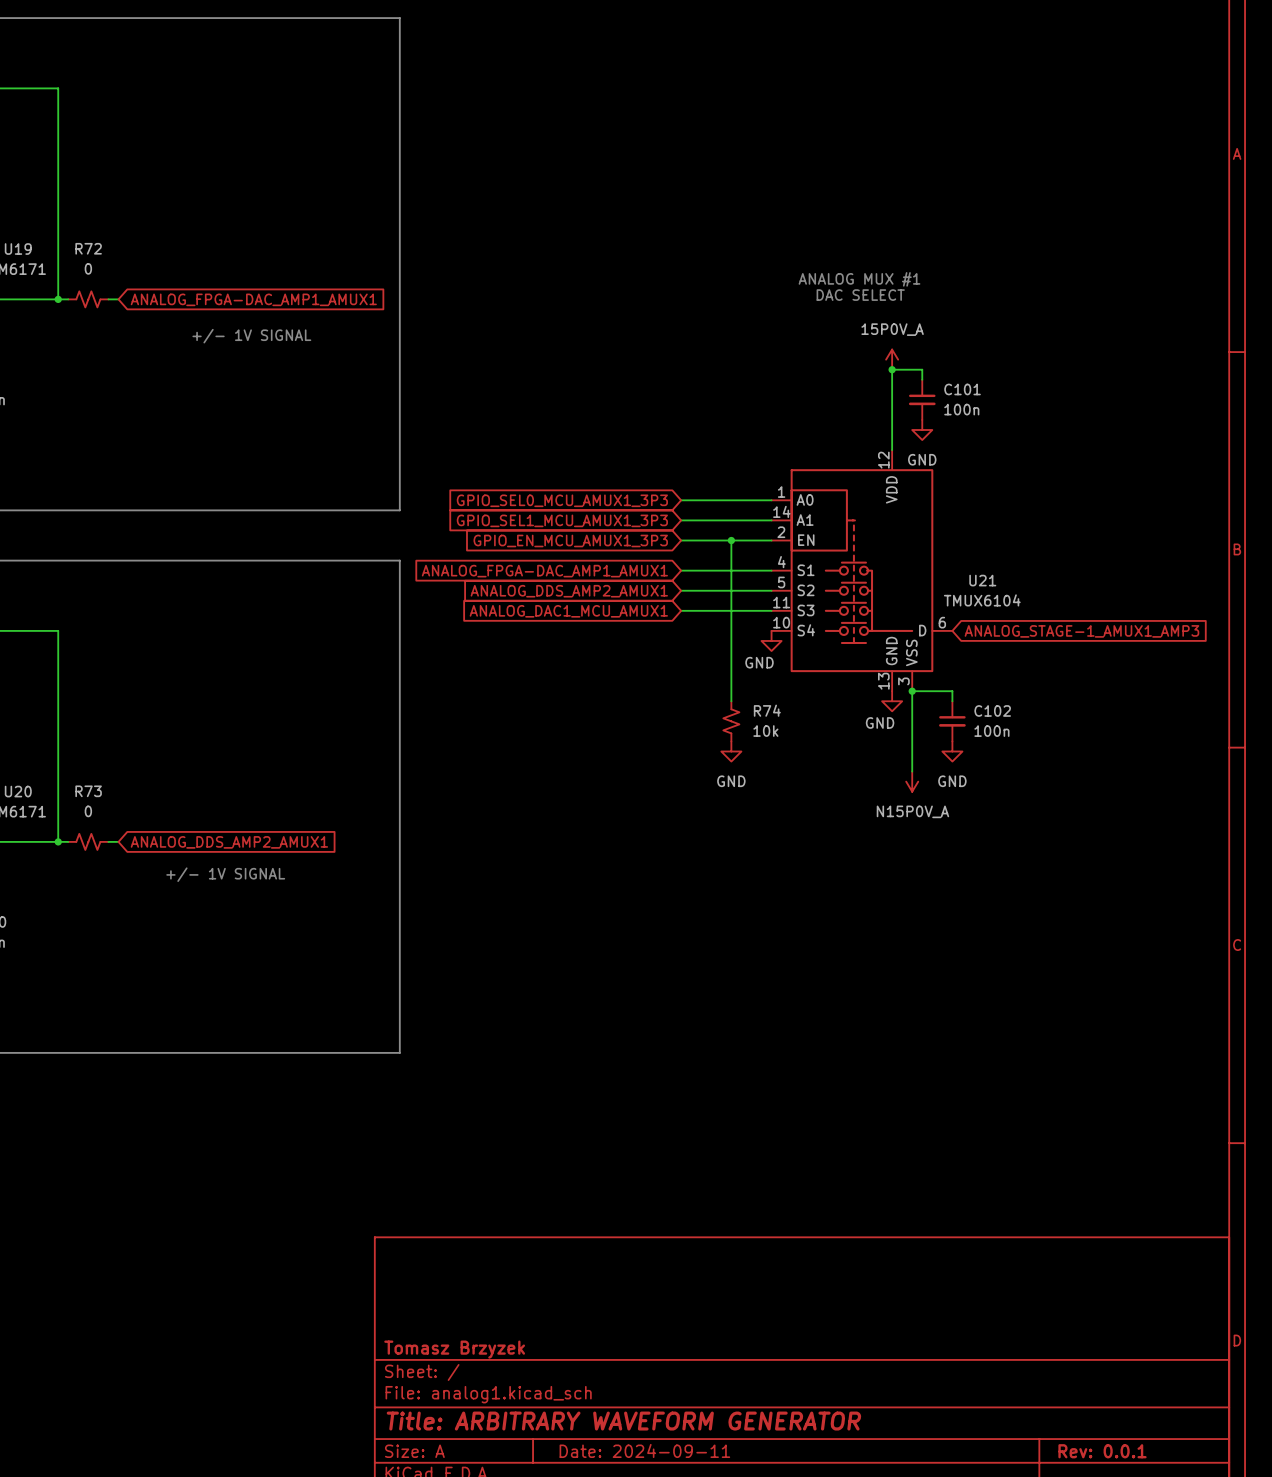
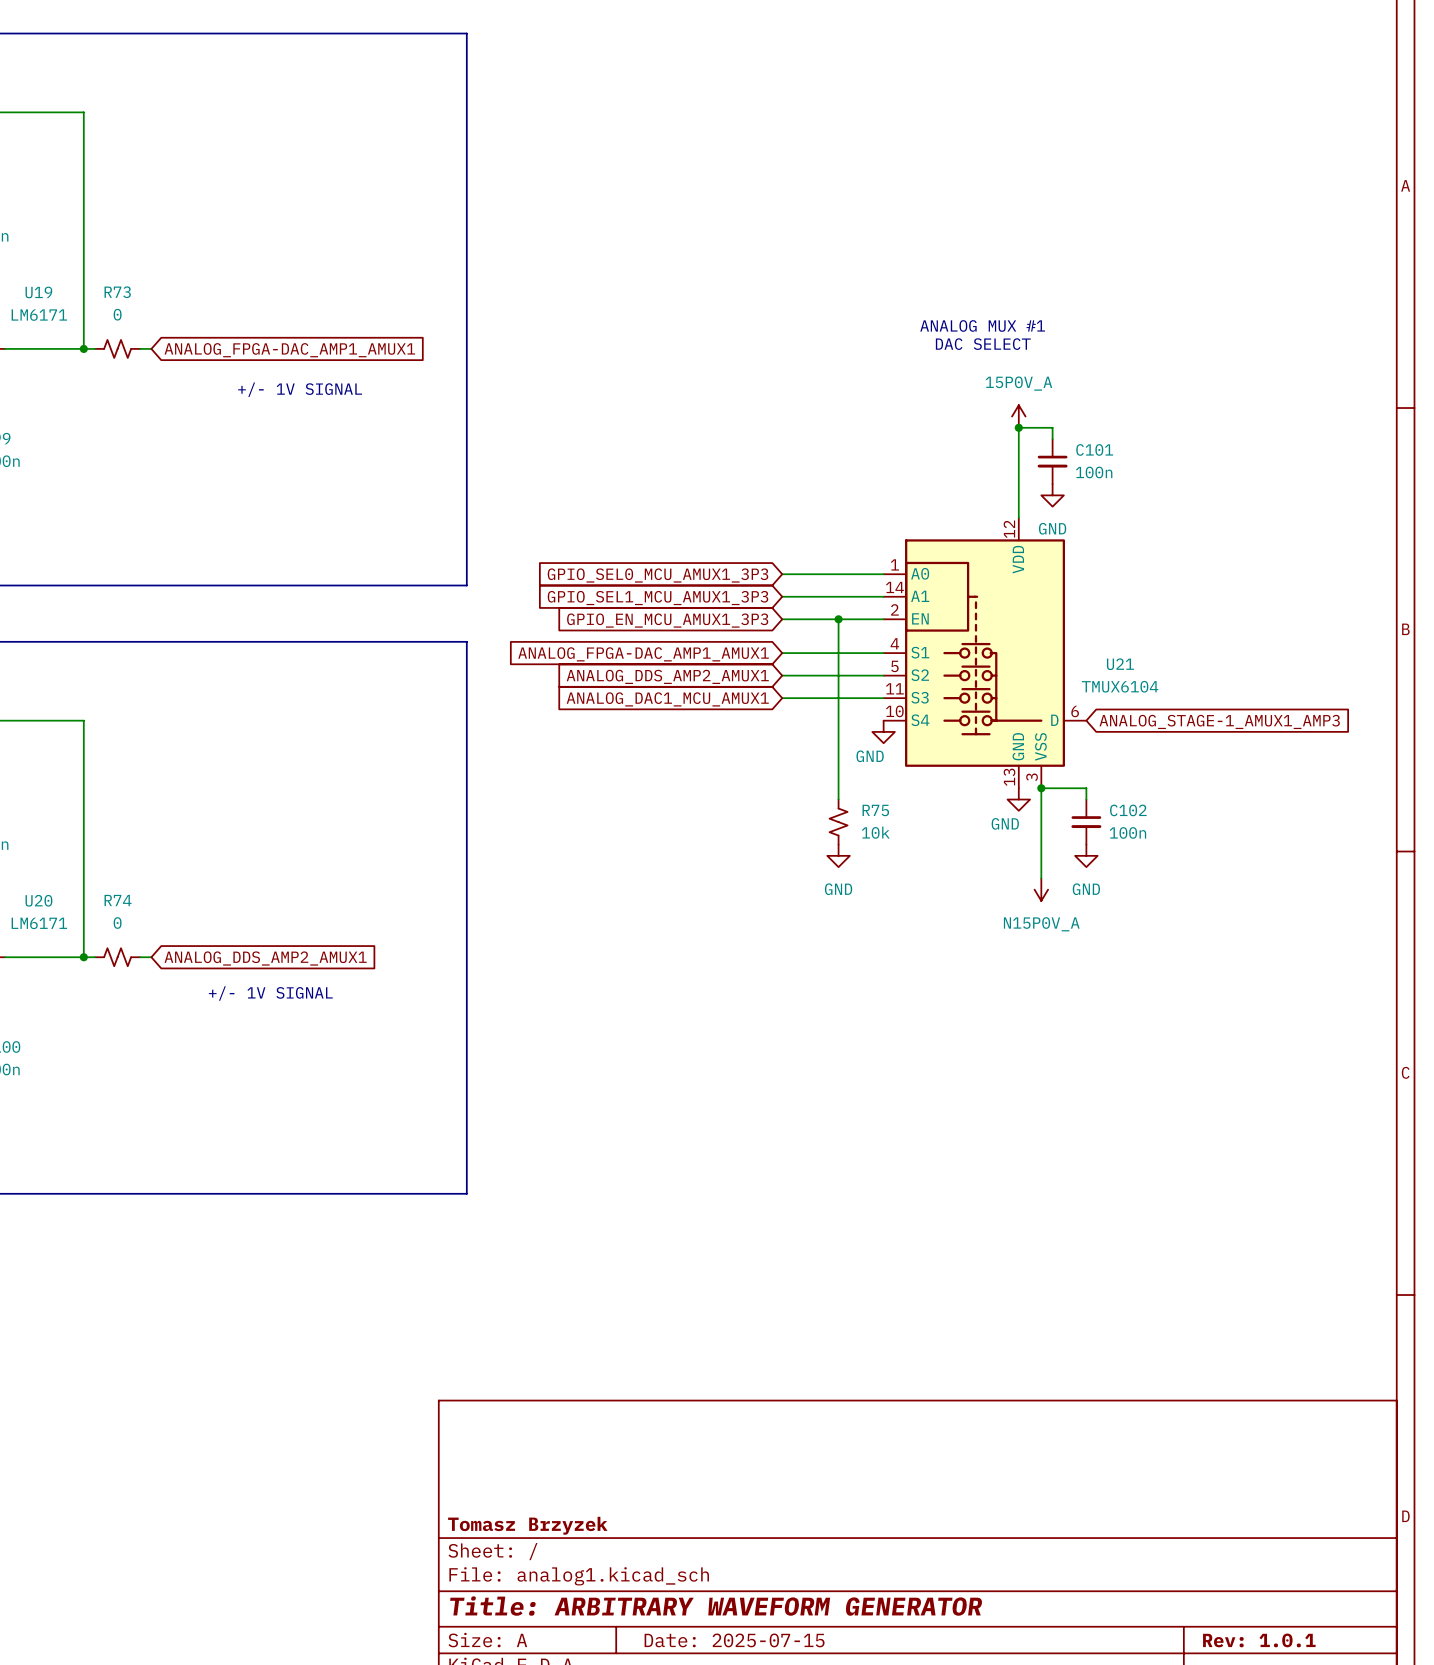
R72 name: R72 (88, 248) -> R73 (117, 292)
R74 name: R74 (767, 710) -> R75 (875, 810)
R73 name: R73 (88, 791) -> R74 (118, 900)
title block: Date: 2024-09-11 (644, 1450) -> Date: 2025-07-15 (734, 1640)
title block: Rev: 0.0.1 (1102, 1451) -> Rev: 1.0.1 (1259, 1640)

